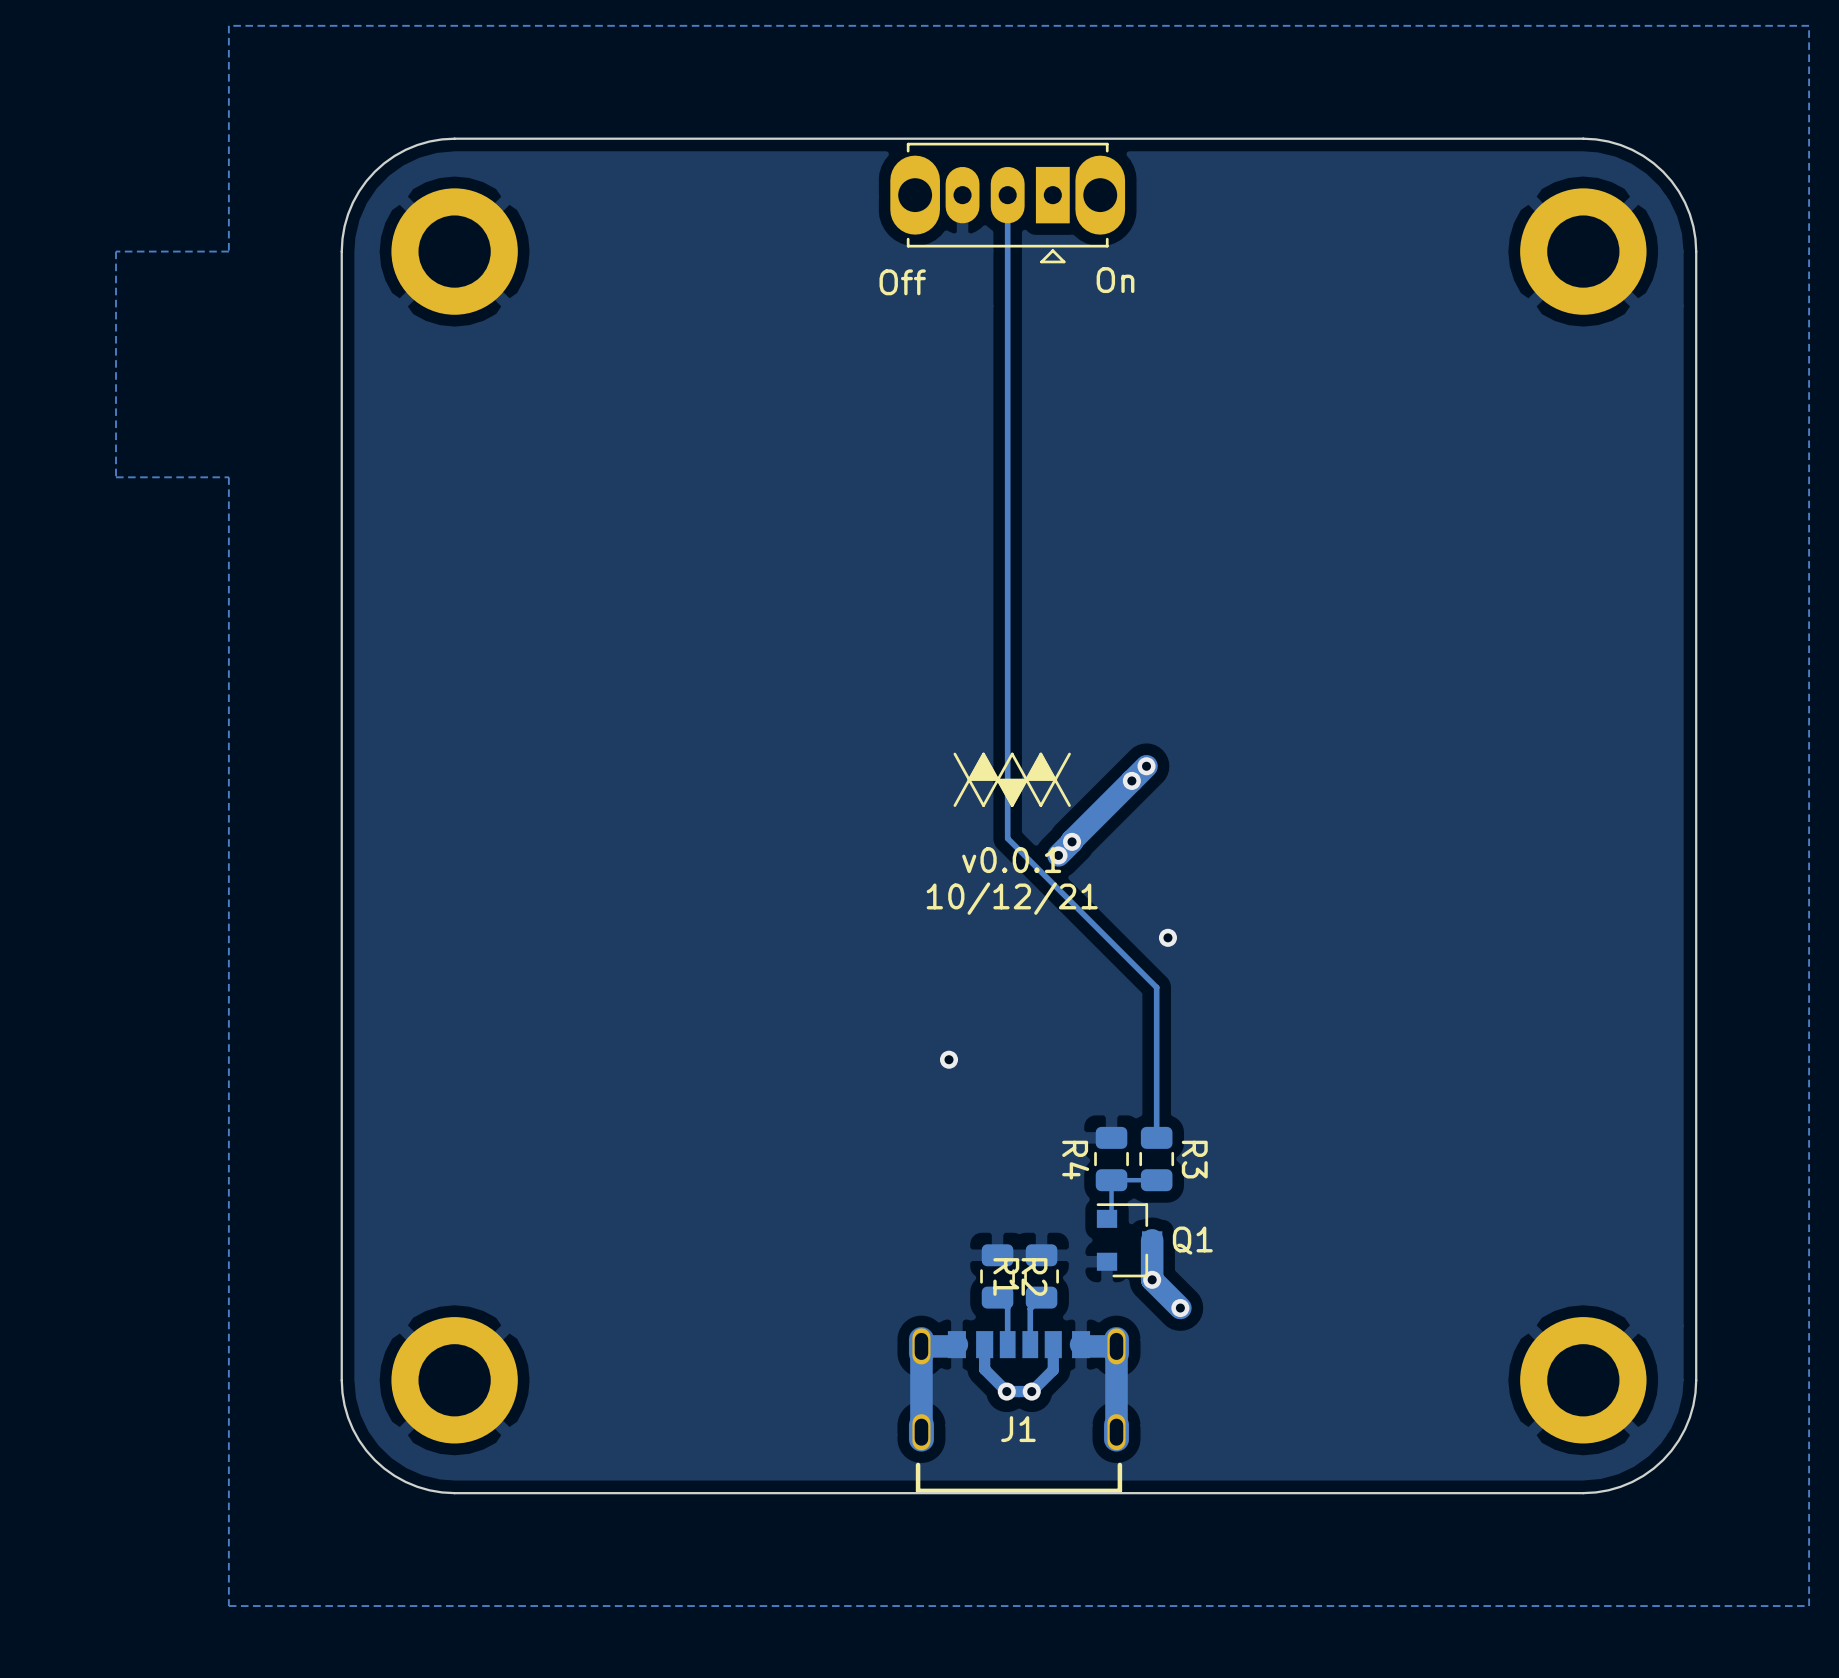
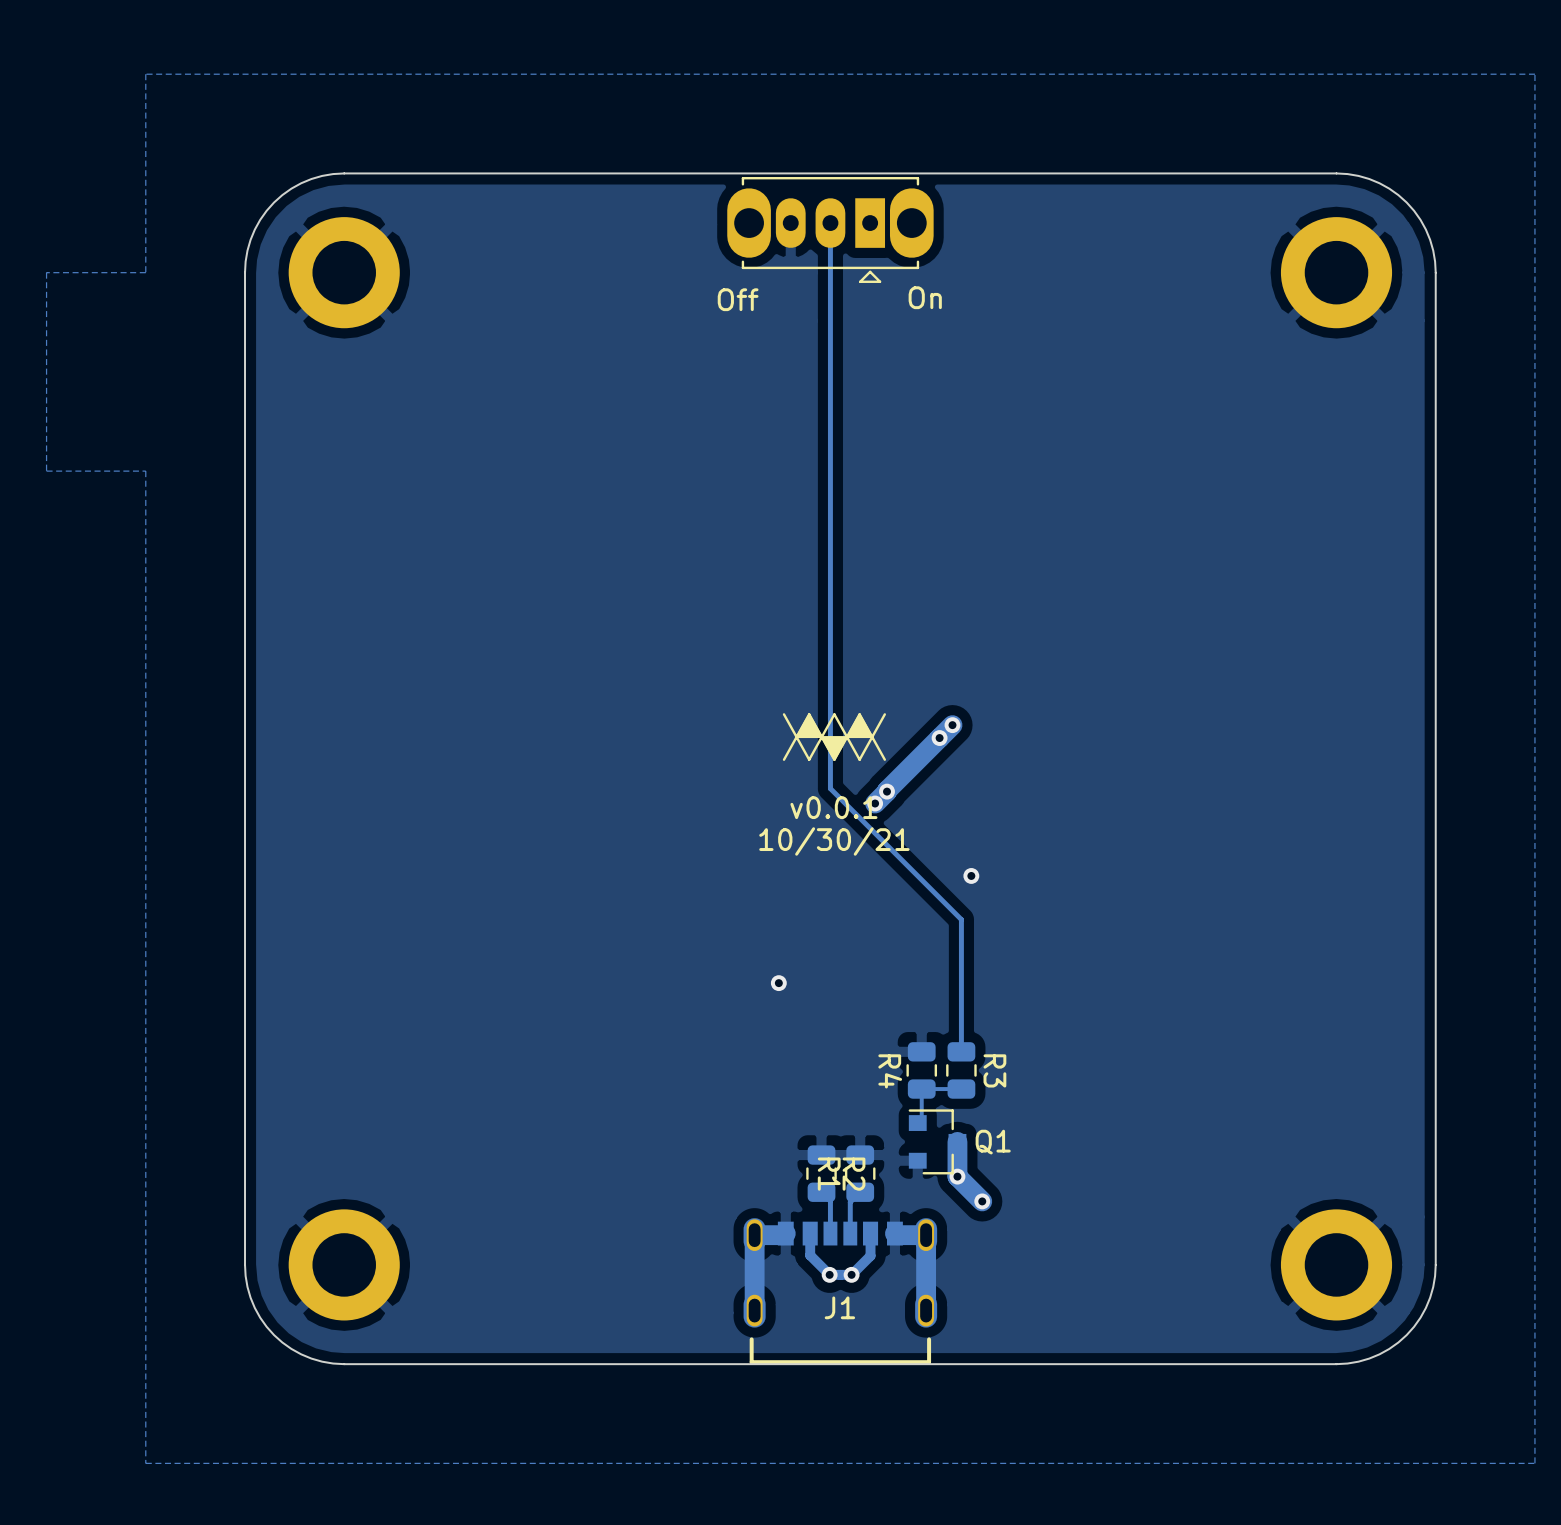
text: 10/12/21 (1012, 898) -> 10/30/21 (834, 841)

